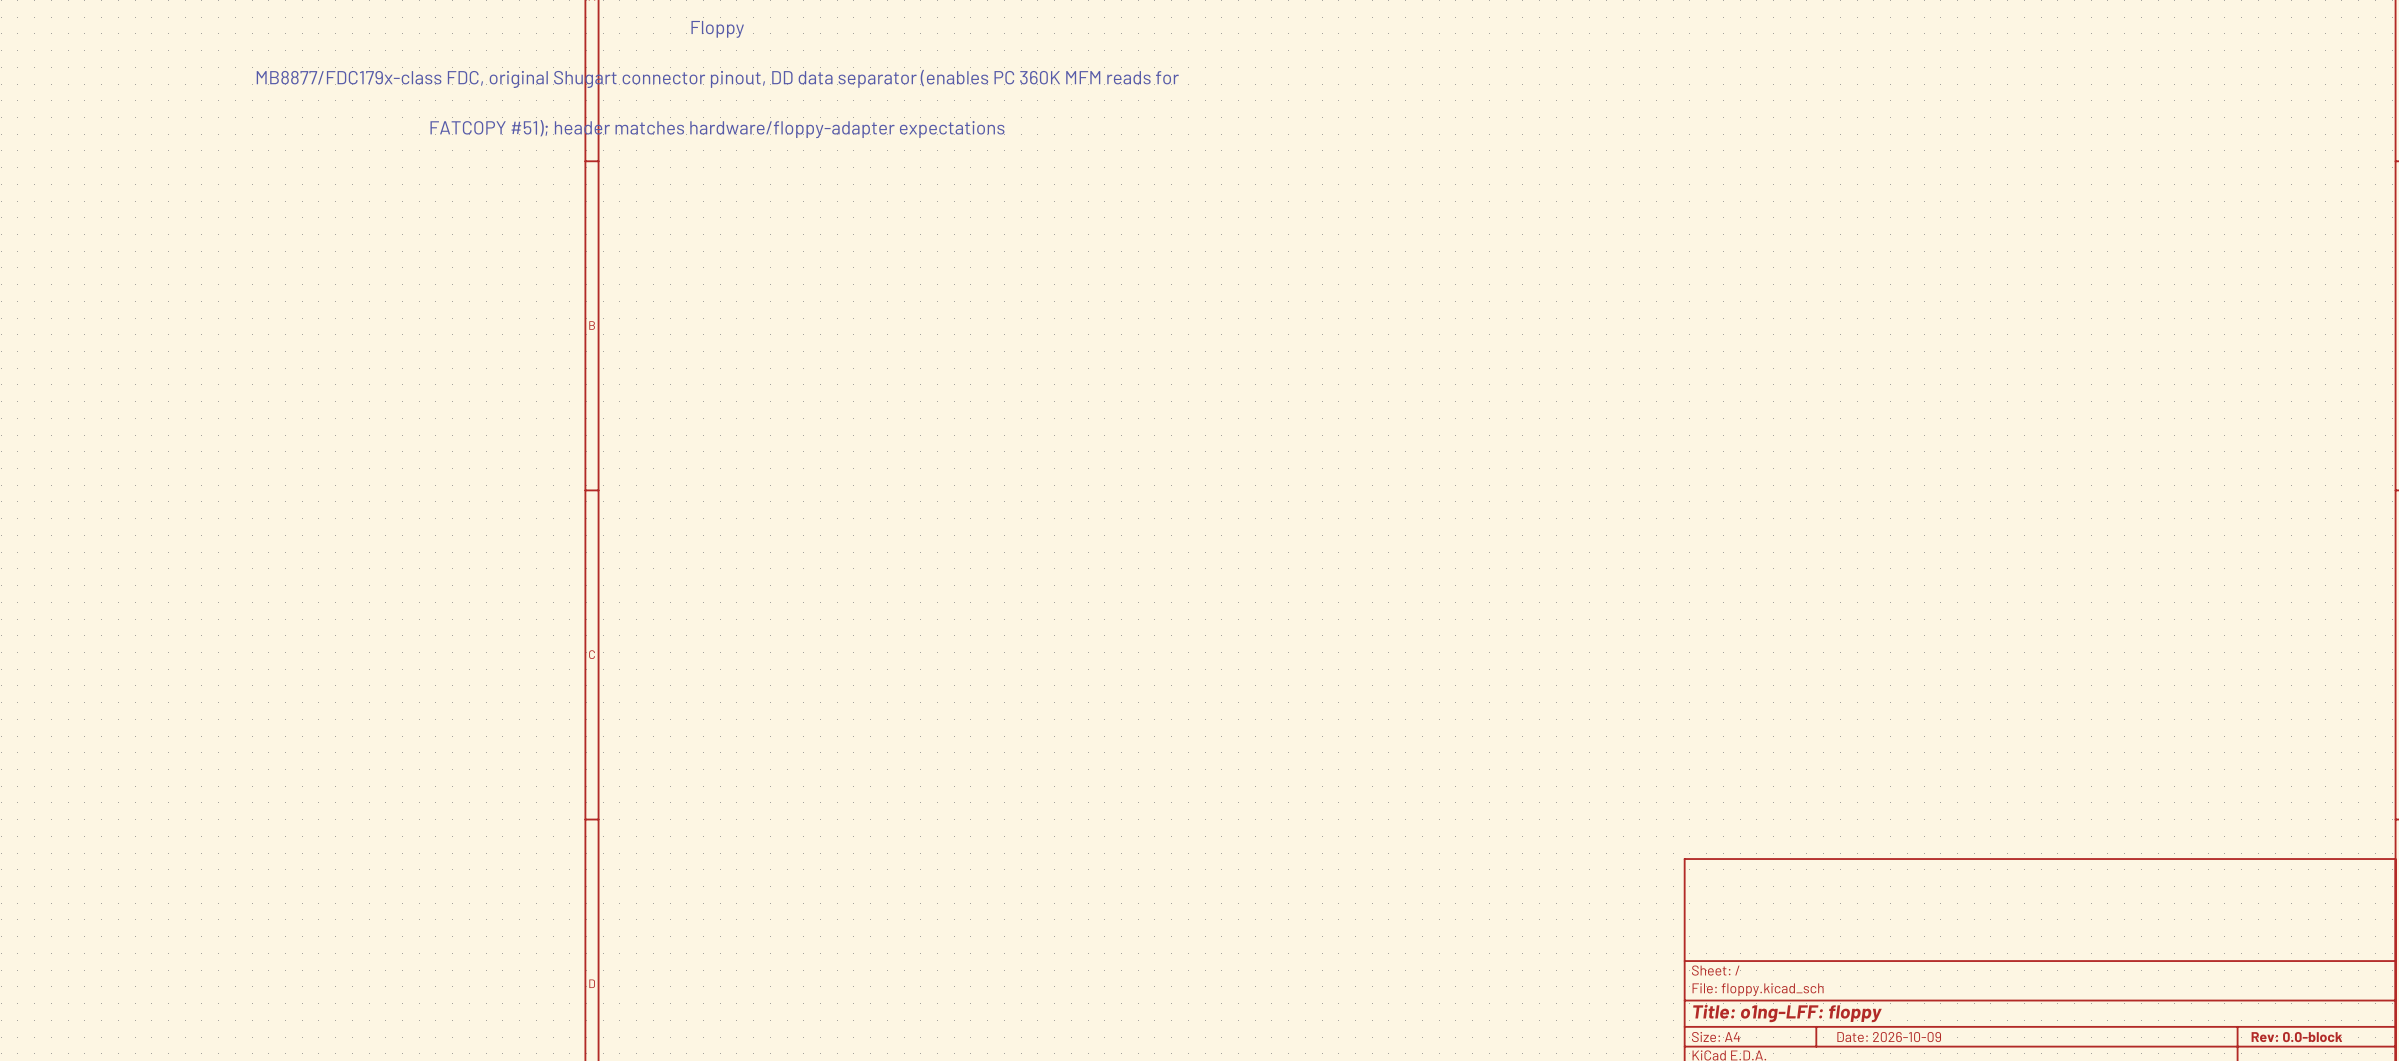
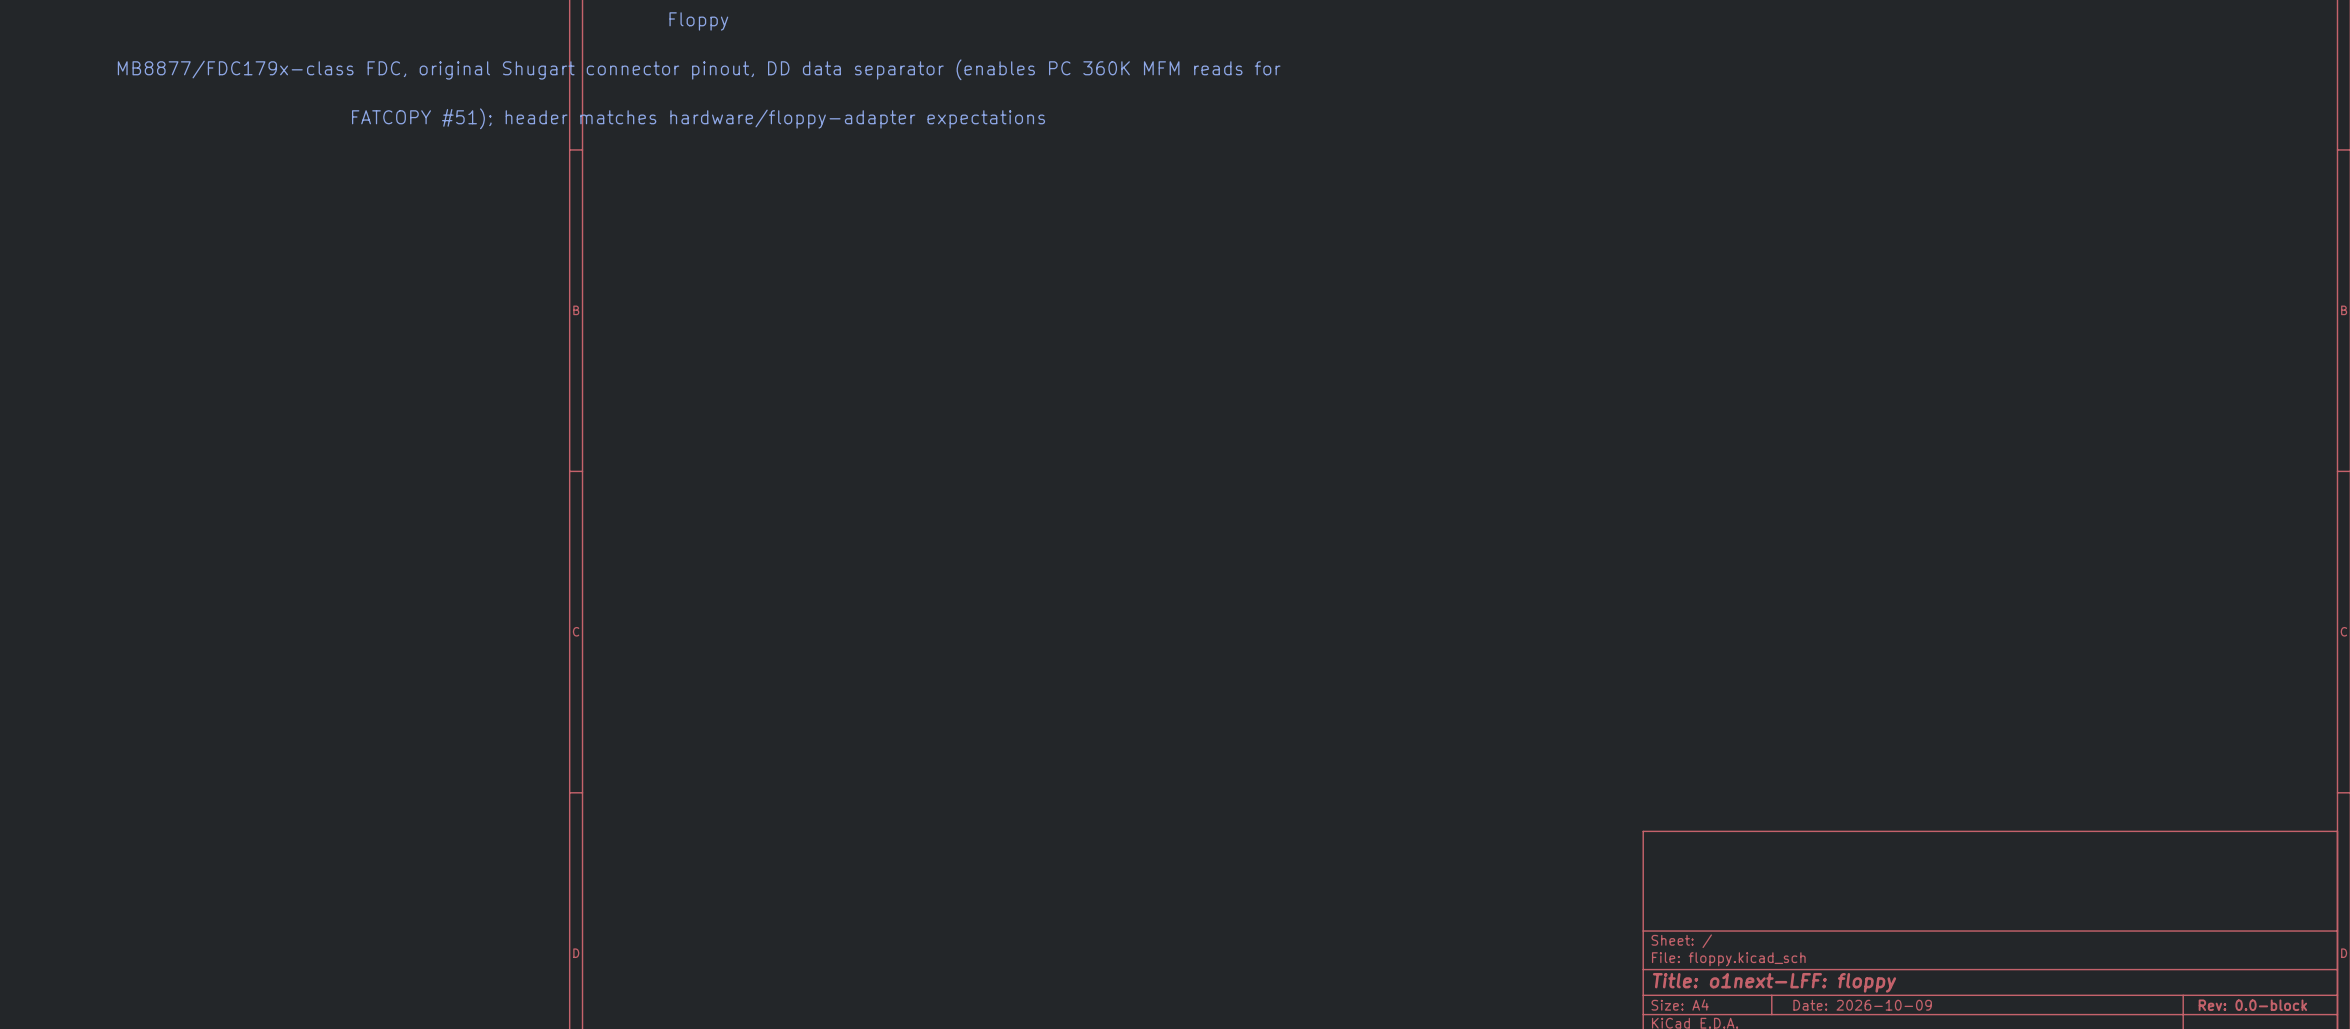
title block: Title: o1ng-LFF: floppy (1787, 1013) -> Title: o1next-LFF: floppy (1774, 982)

